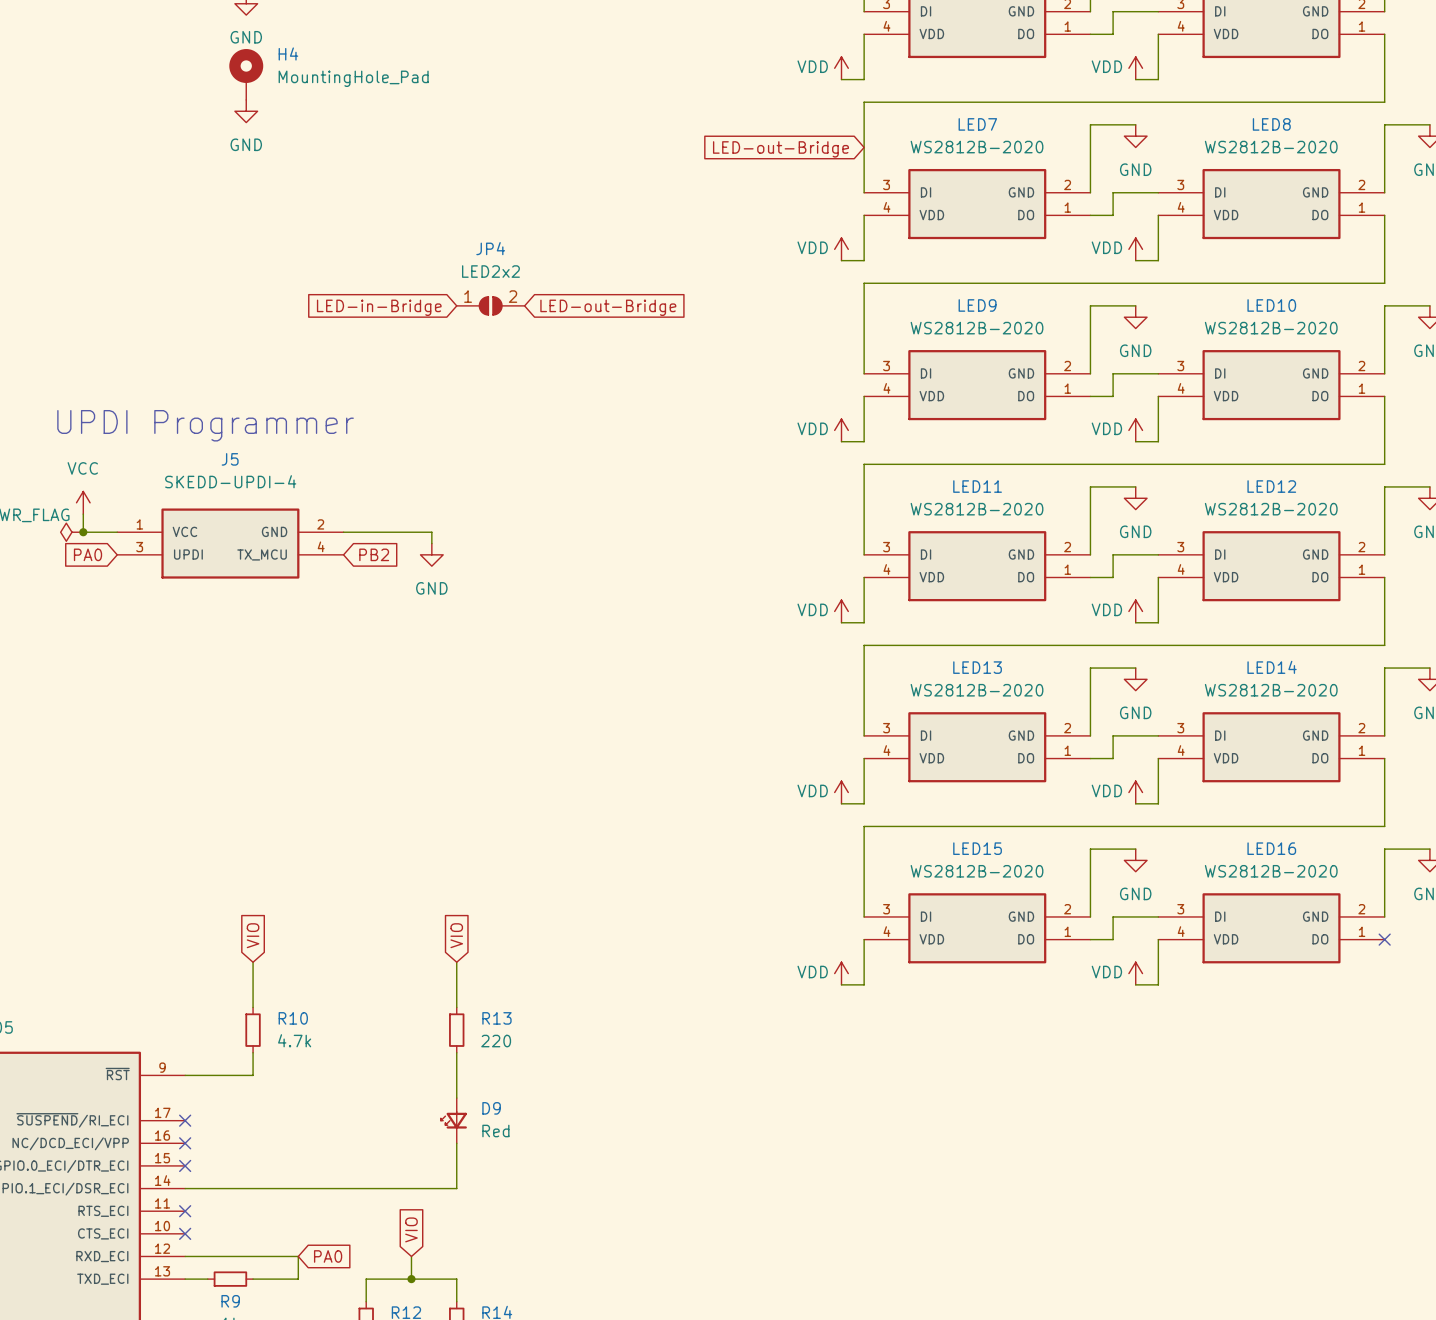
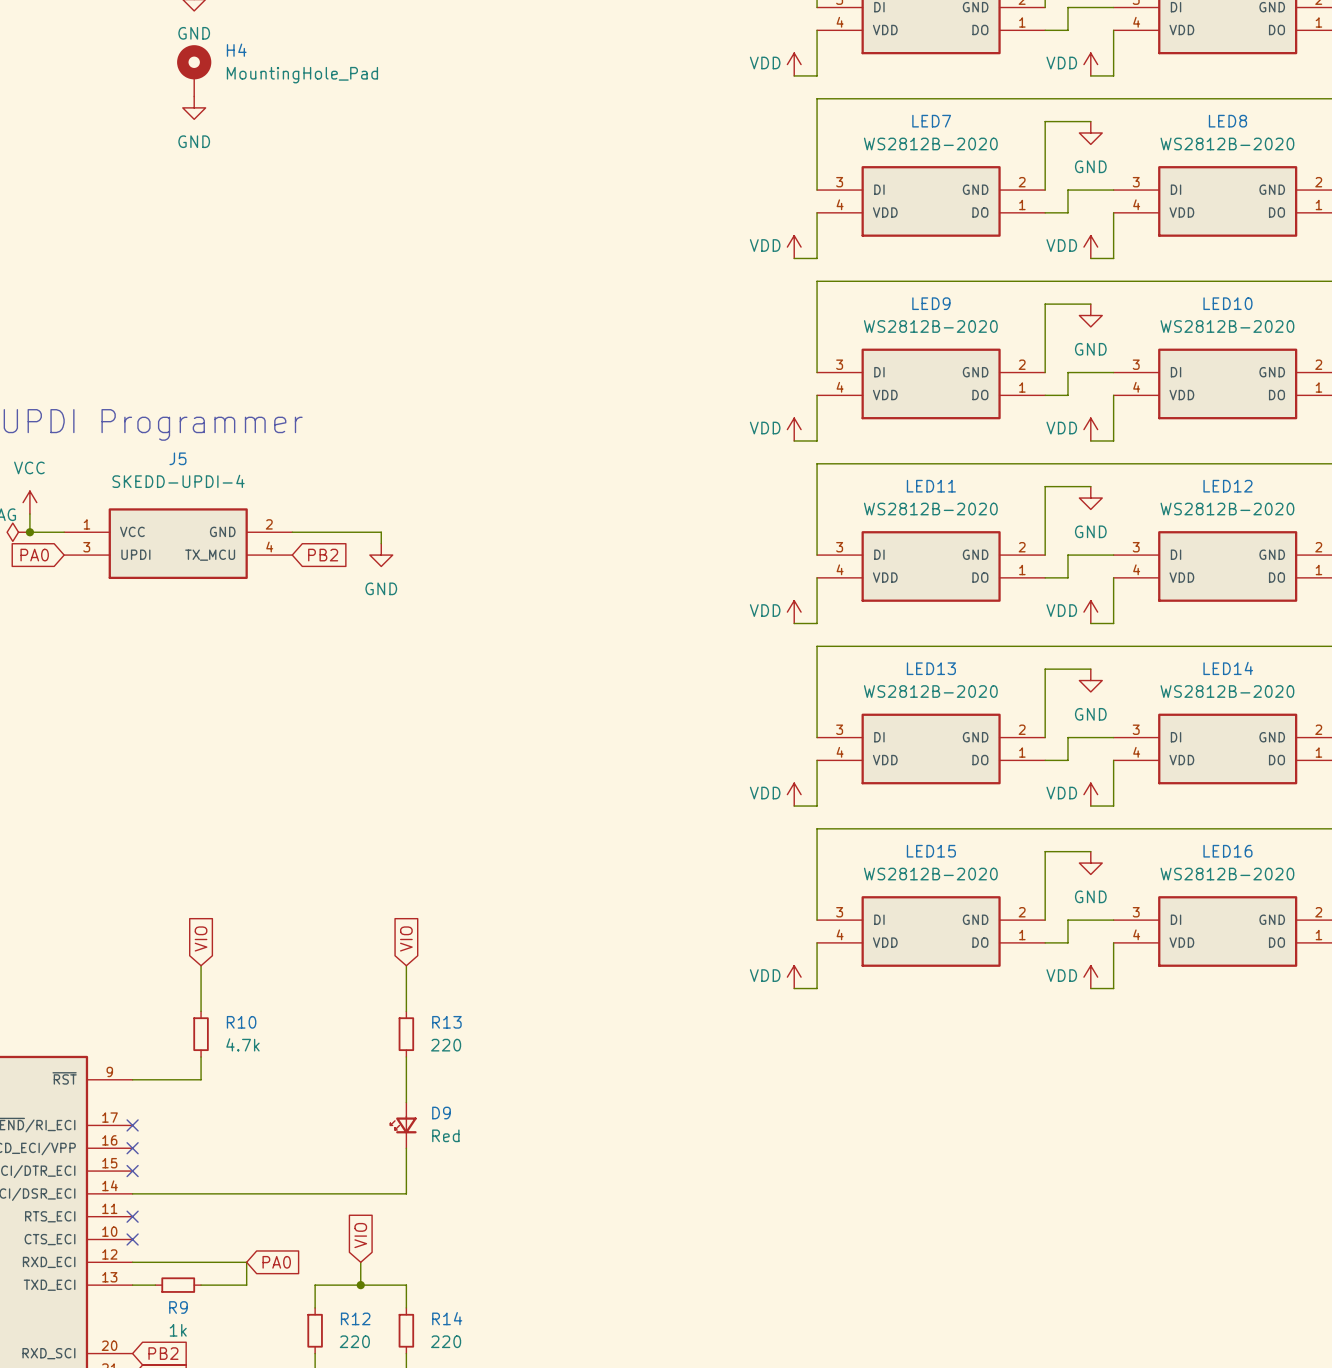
global label: LED-out-Bridge (780, 149) -> none
JP4: LED2x2 (490, 305) -> none
global label: LED-in-Bridge (379, 307) -> none
global label: LED-out-Bridge (608, 307) -> none

